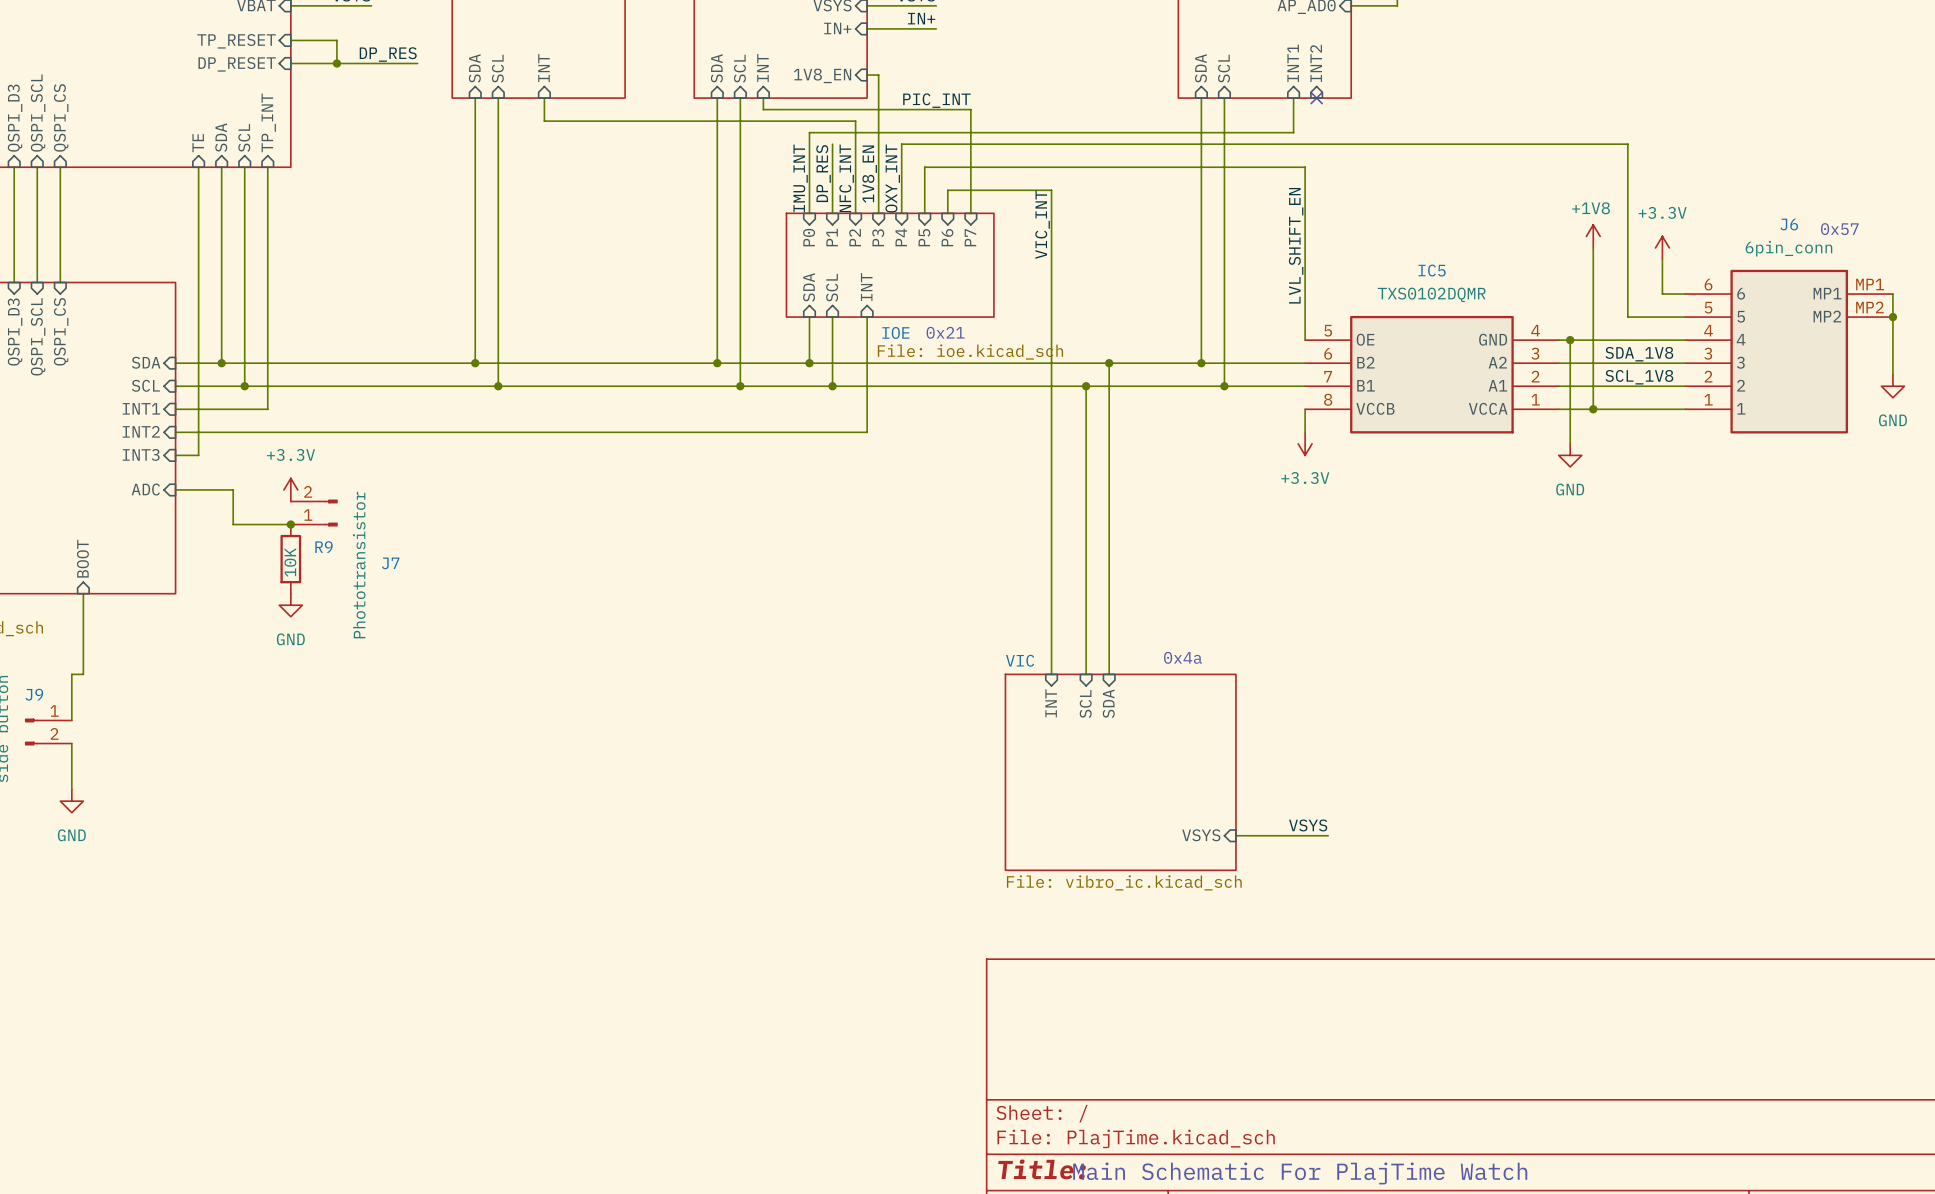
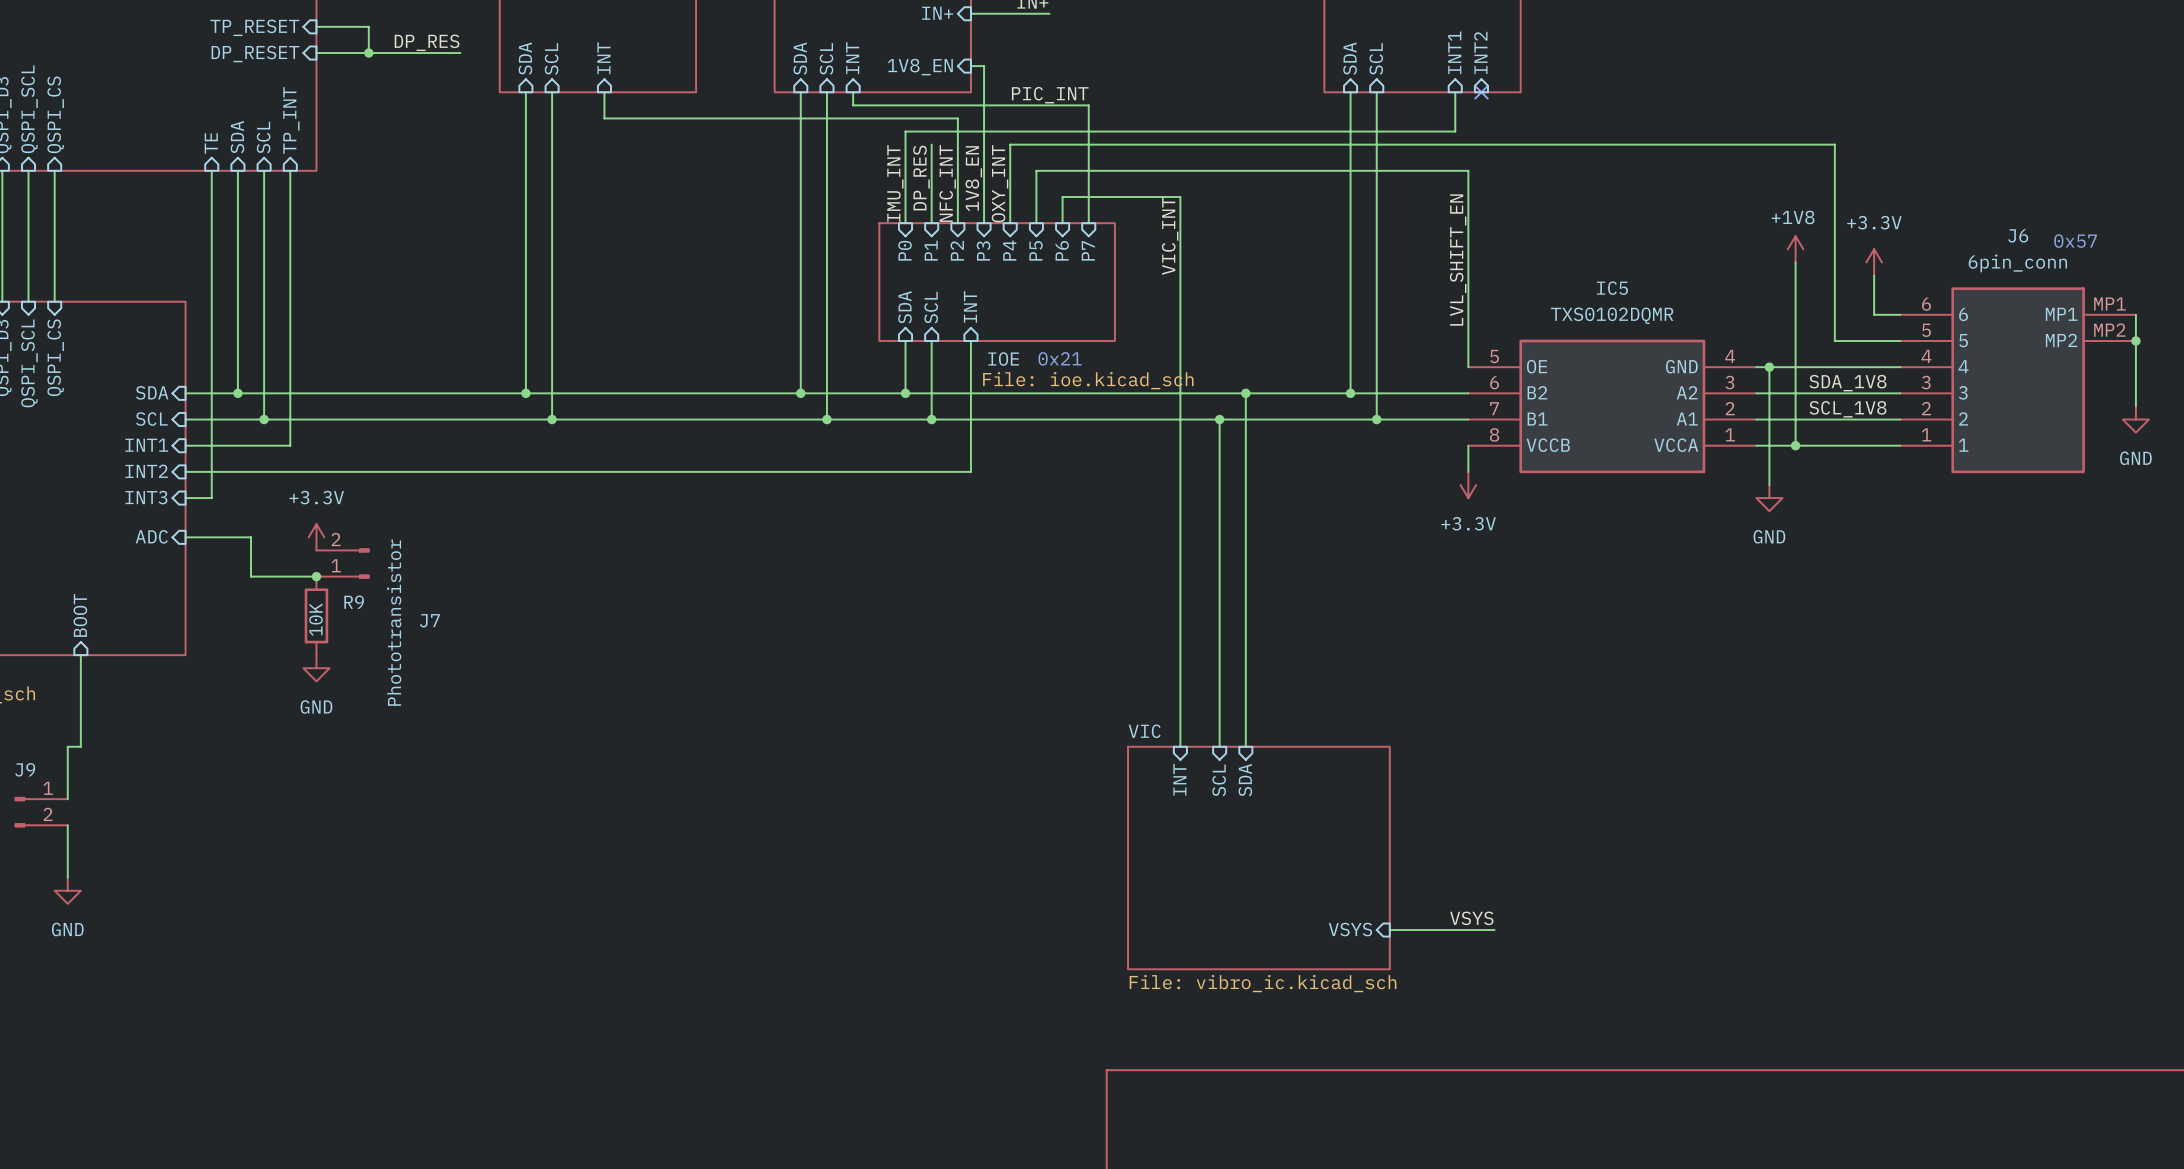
text: 0x4a (1182, 657) -> none

